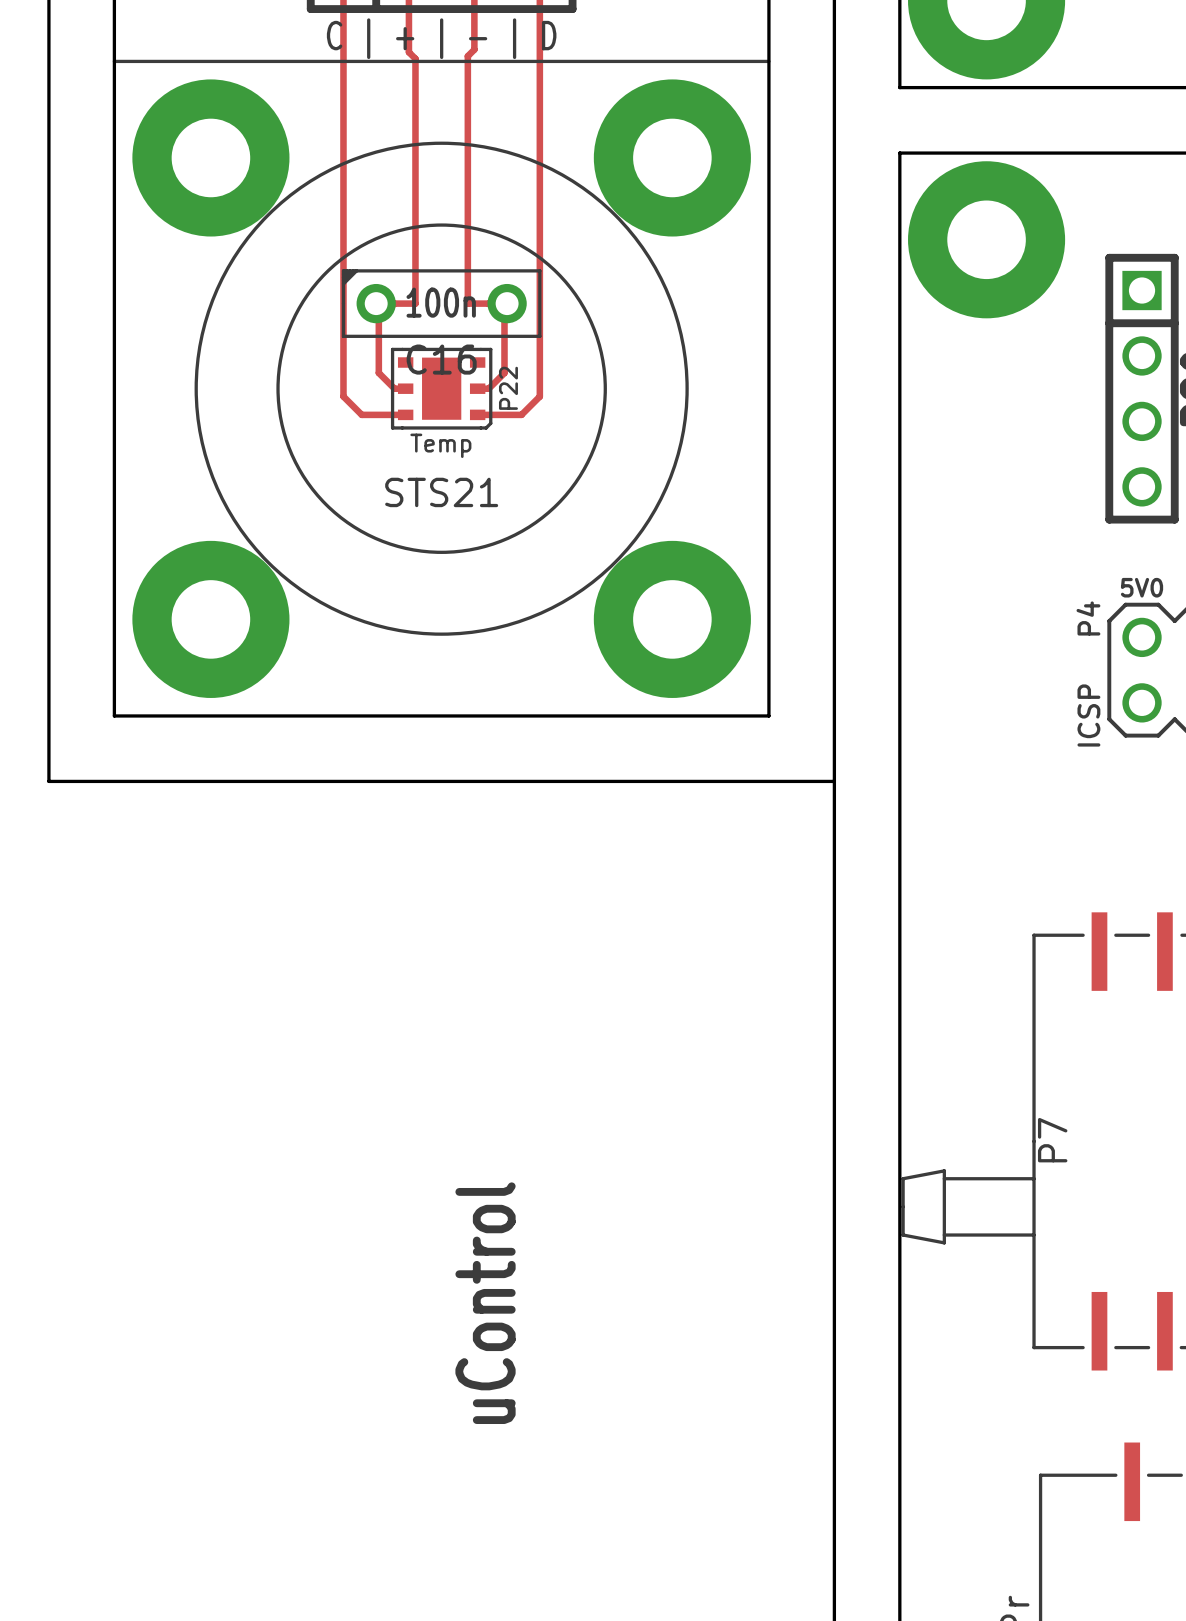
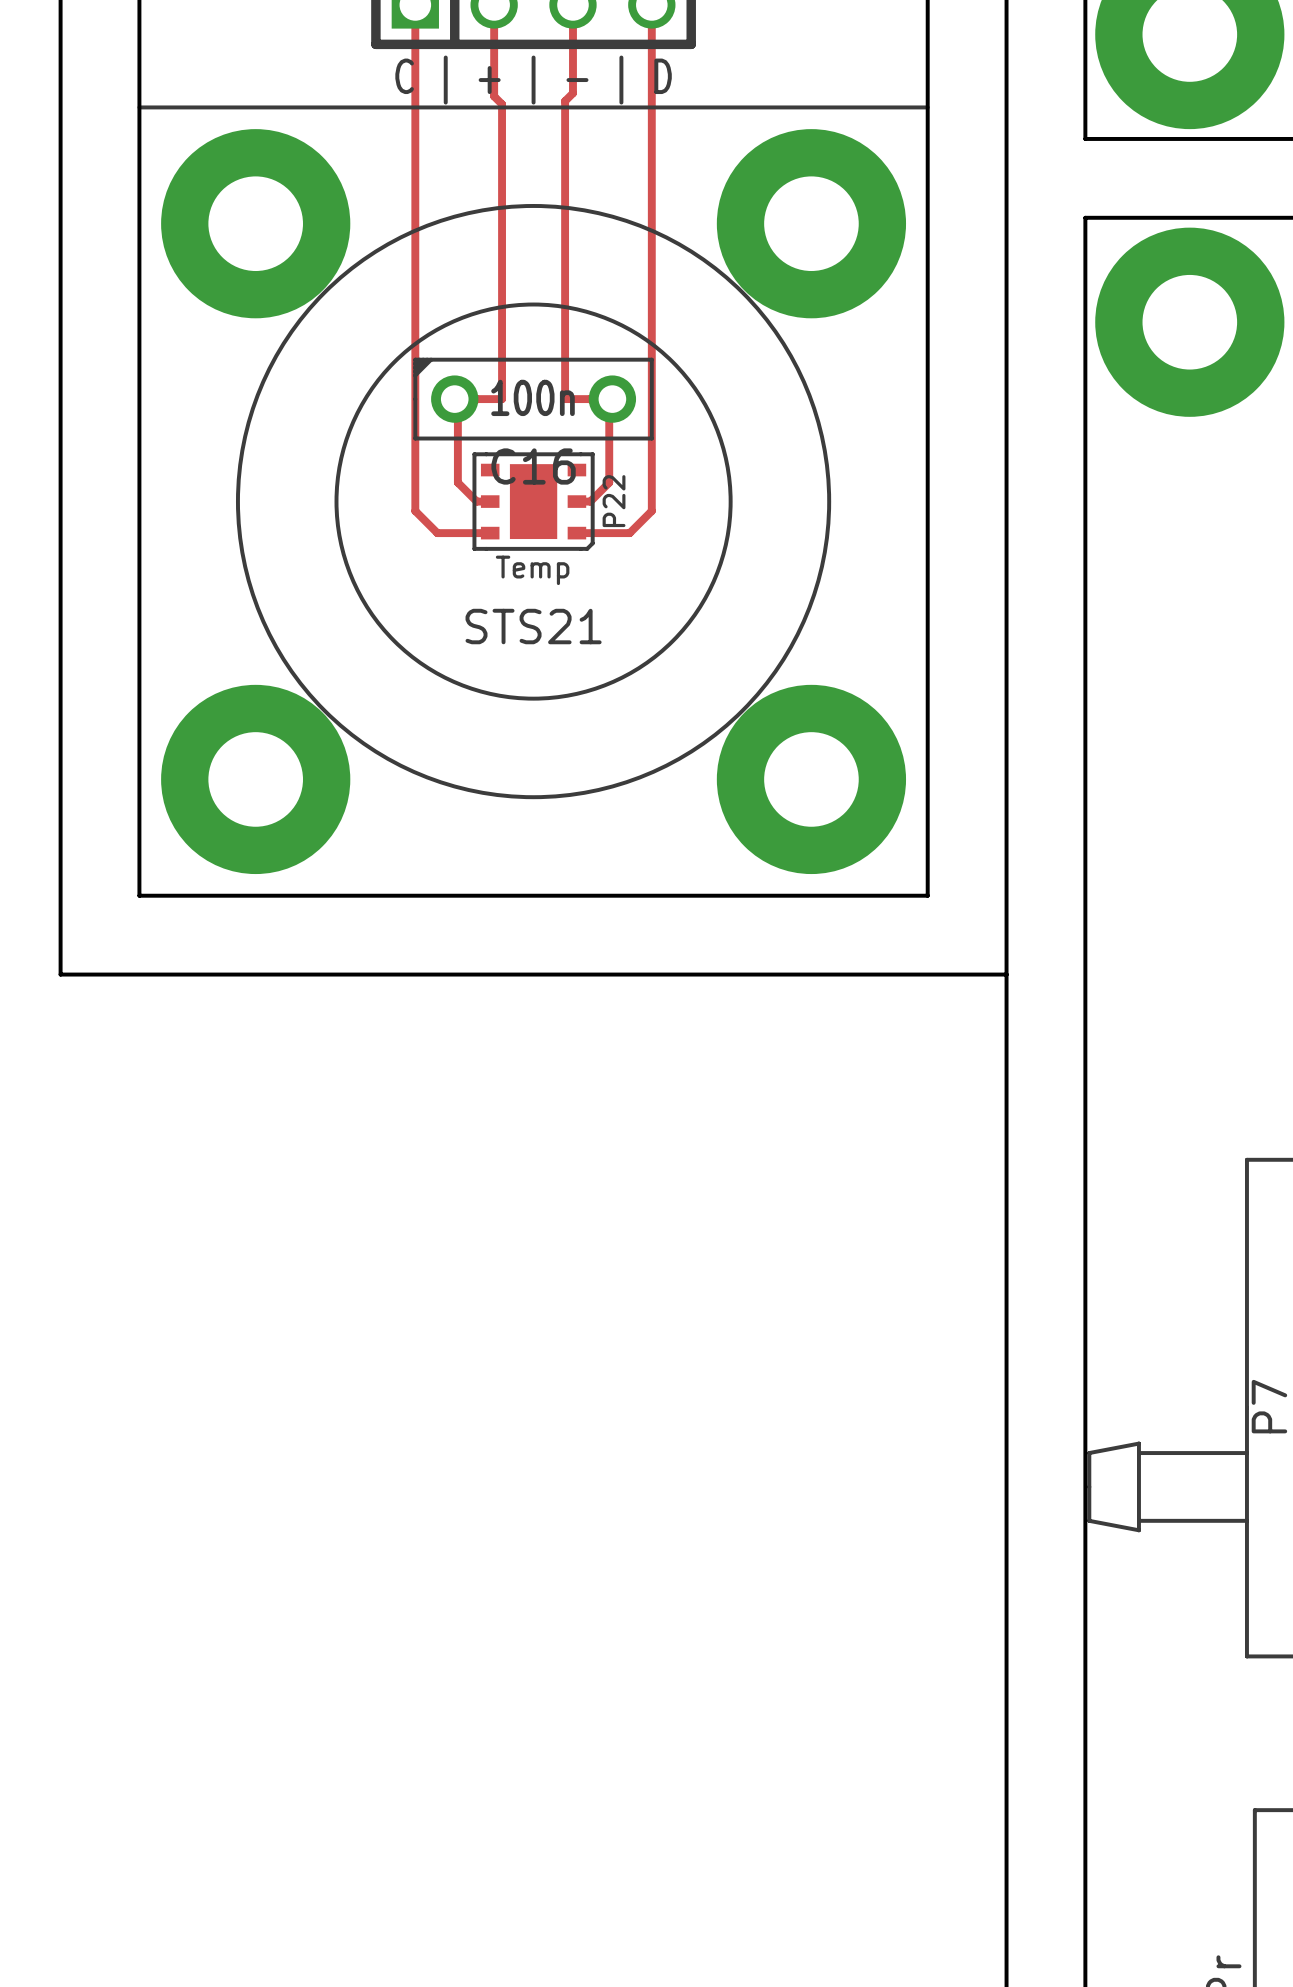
text: uControl (485, 1303) -> none

